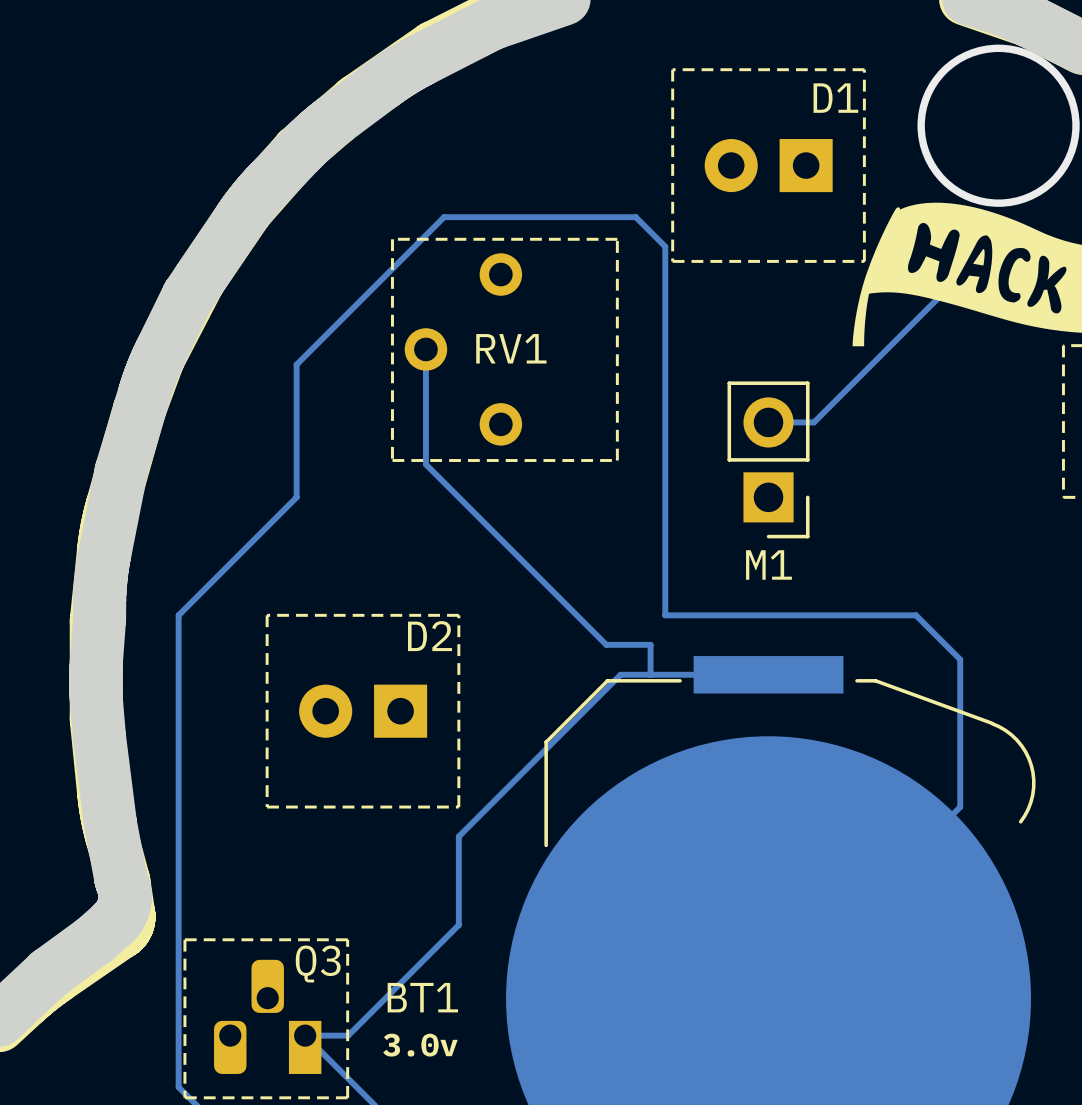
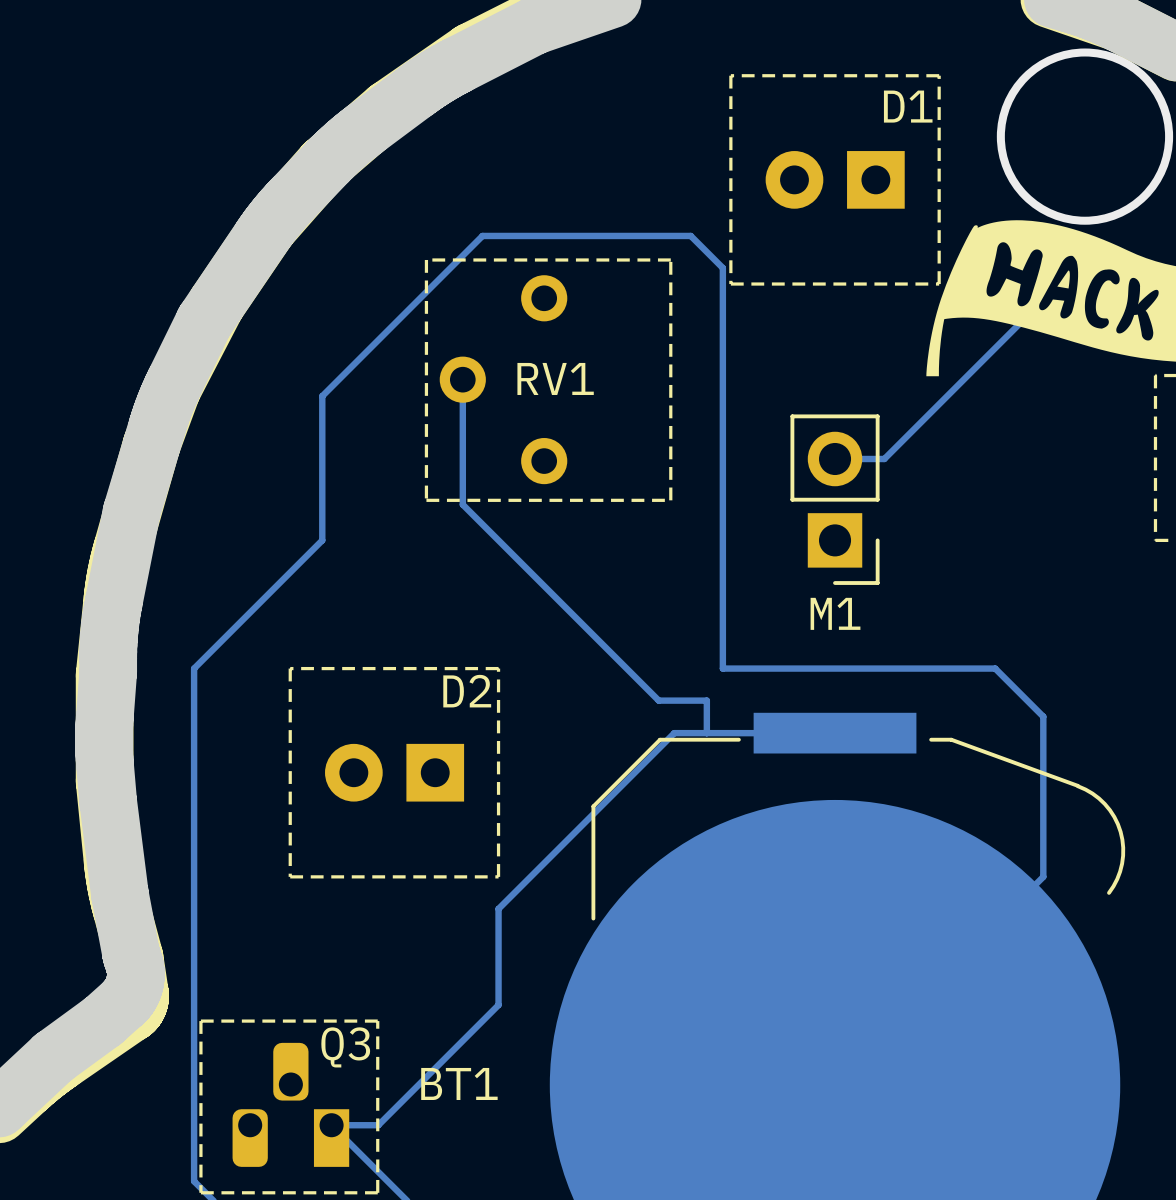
text: 3.0v (420, 1045) -> none

